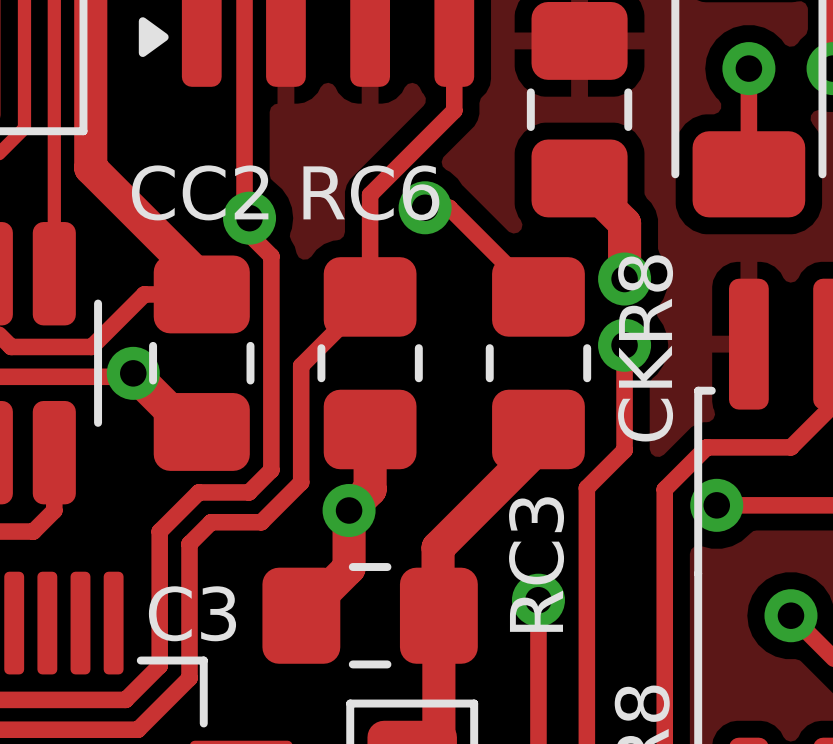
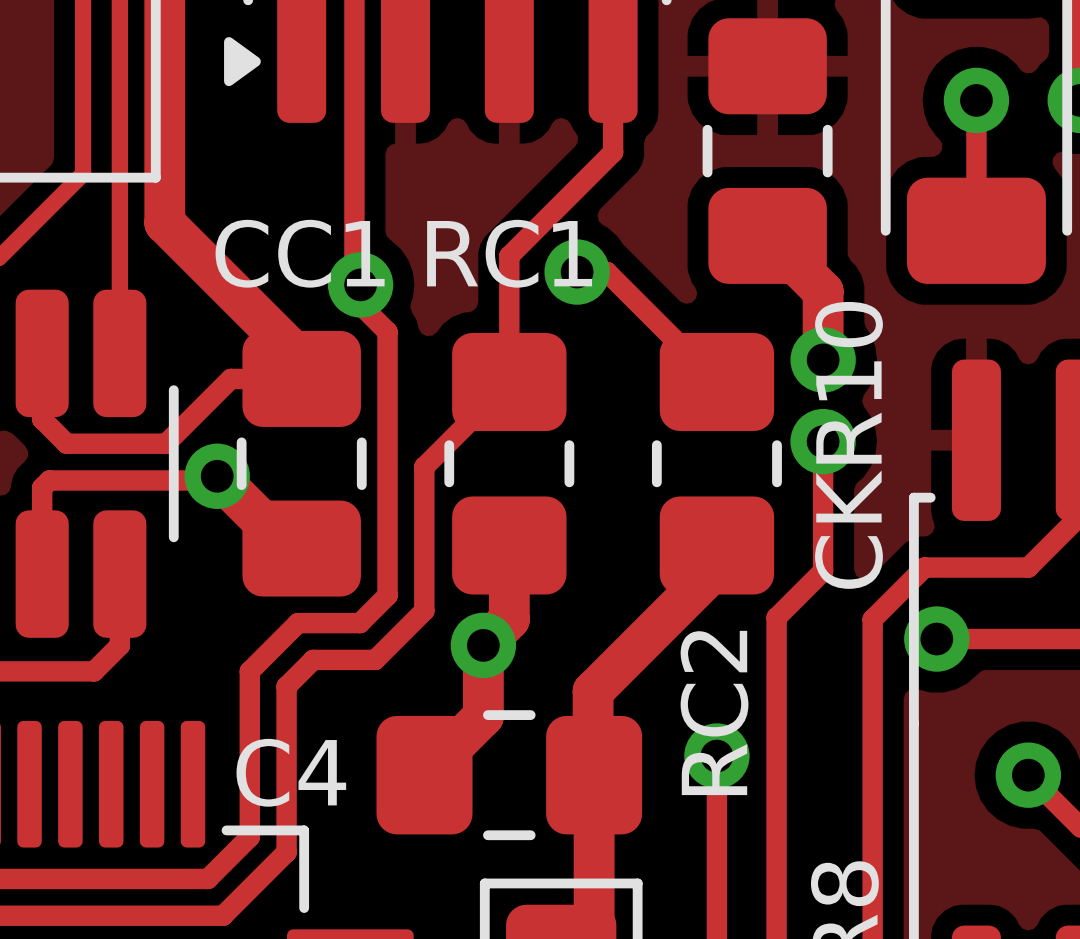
CC2 name: CC2 (200, 192) -> CC1 (300, 253)
RC6 name: RC6 (371, 192) -> RC1 (509, 253)
CKR8 name: CKR8 (645, 348) -> CKR10 (848, 445)
RC3 name: RC3 (536, 564) -> RC2 (714, 712)
C3 name: C3 (192, 613) -> C4 (291, 772)

